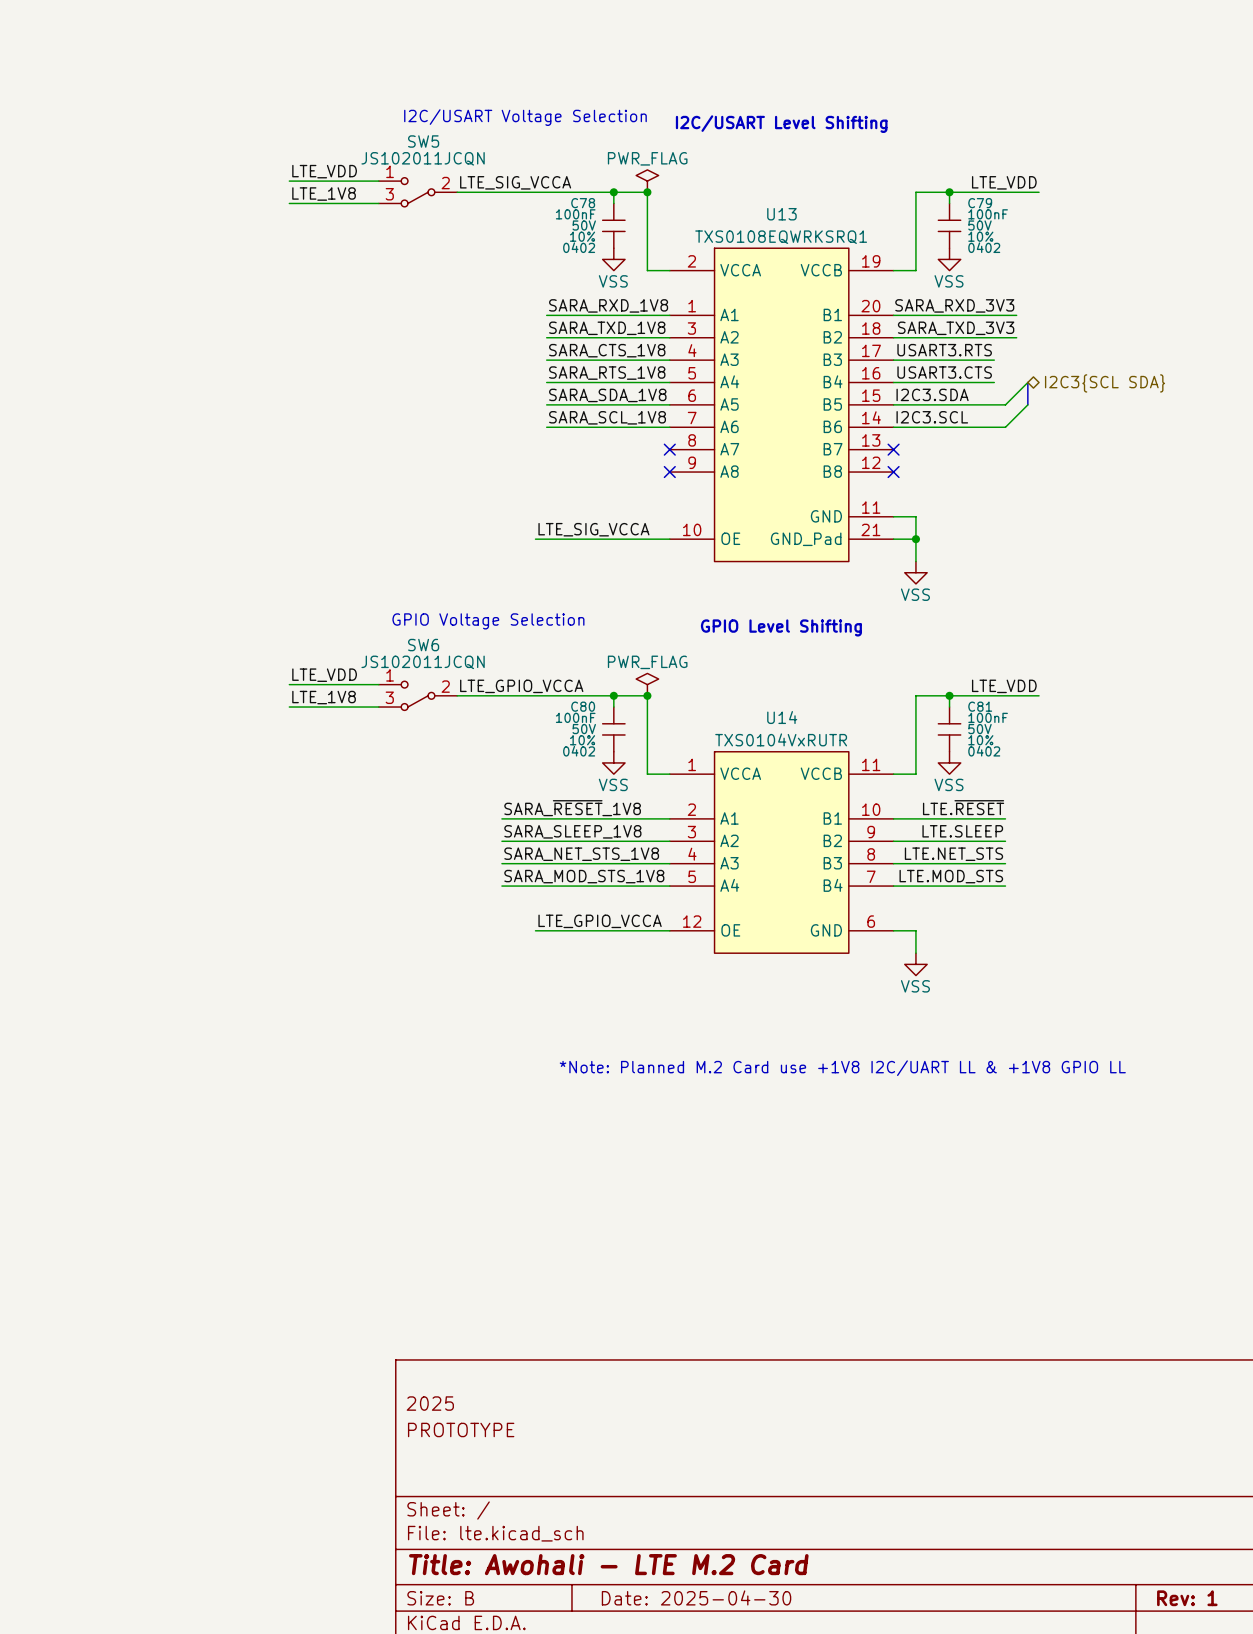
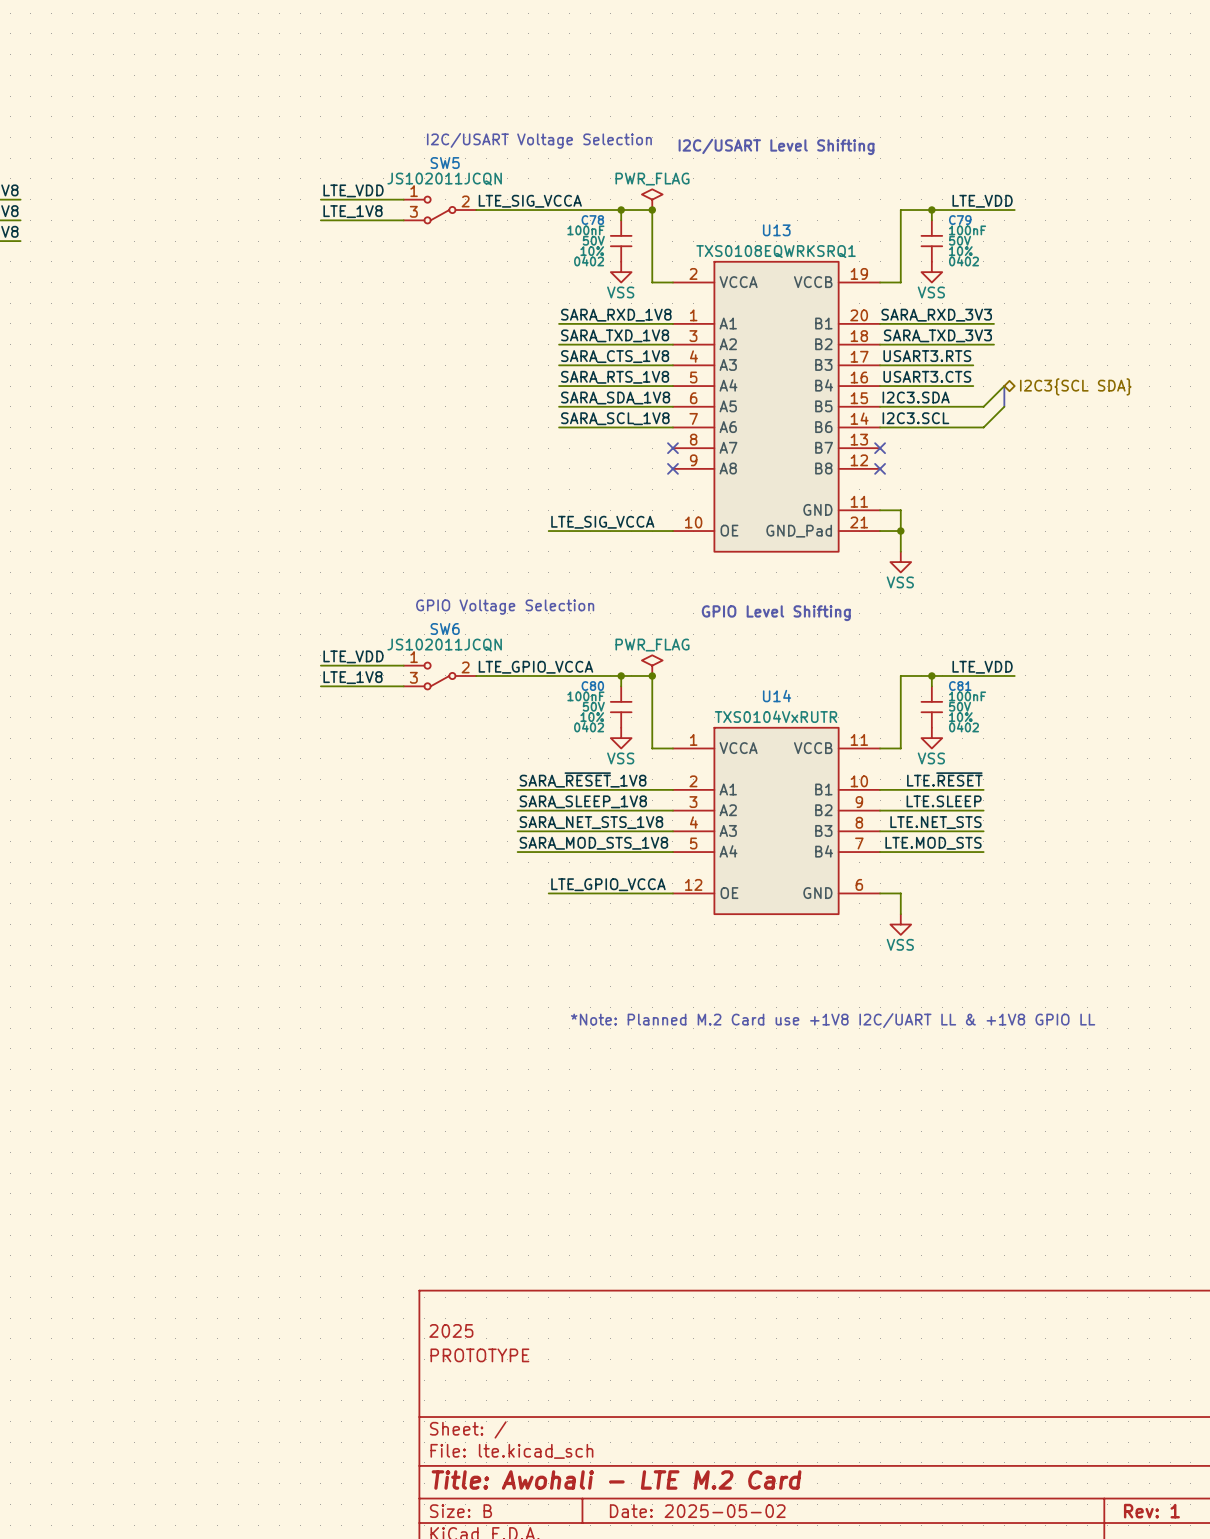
title block: Date: 2025-04-30 (696, 1597) -> Date: 2025-05-02 (697, 1511)

